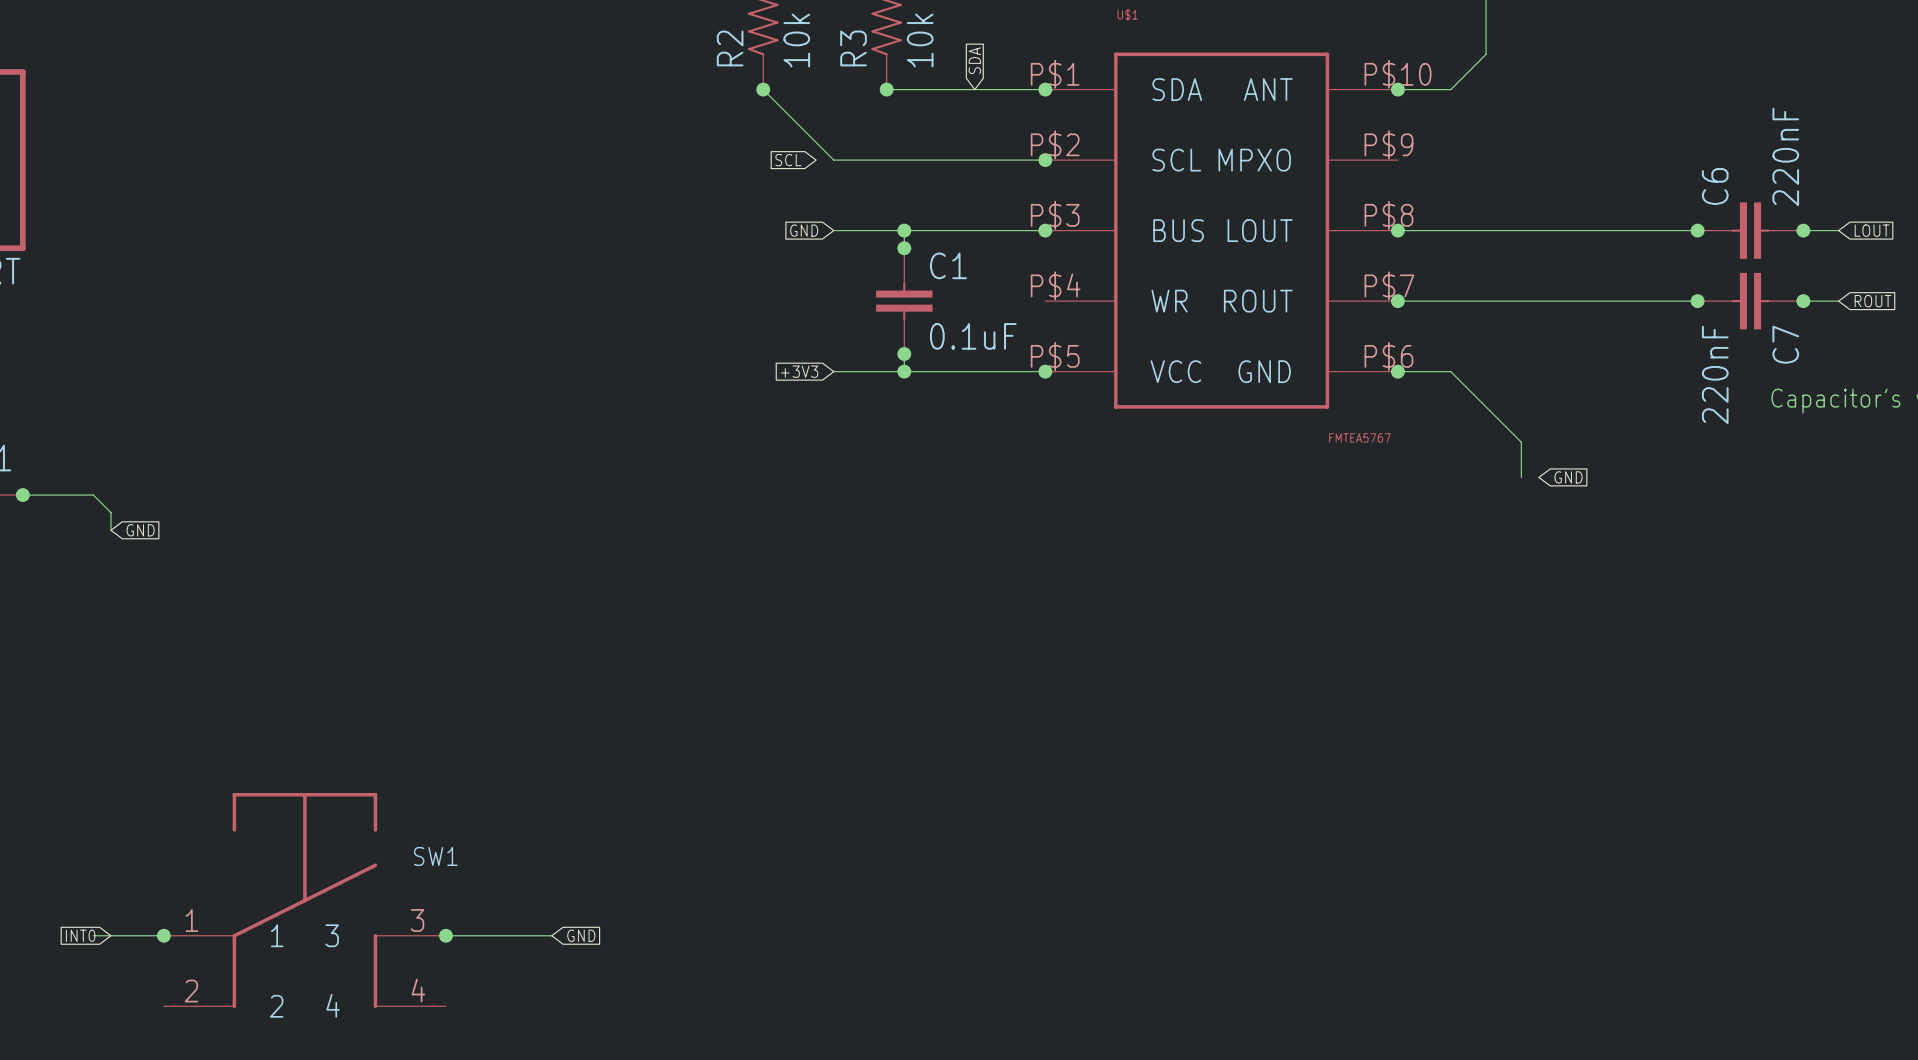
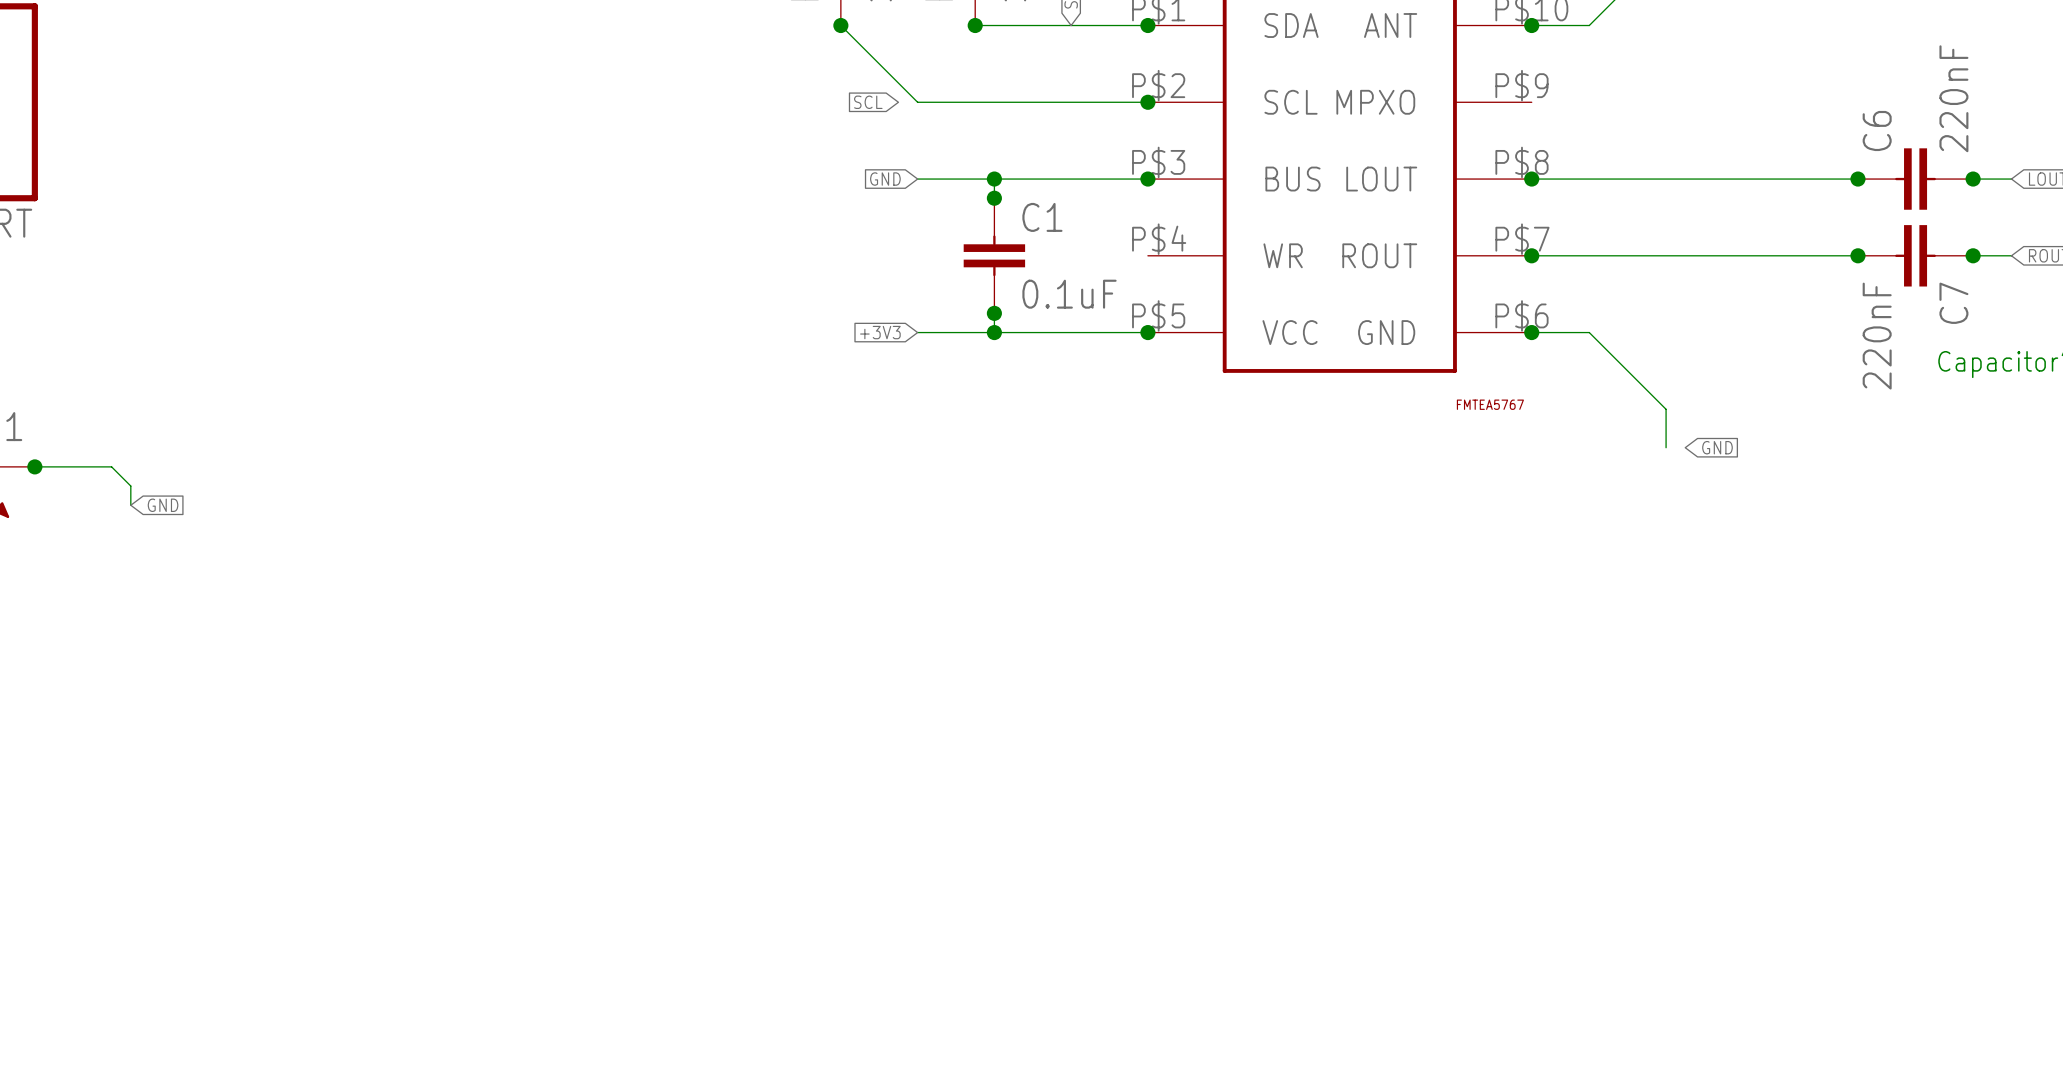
SW1: (304, 900) -> none
global label: INT0 (80, 935) -> none
wire: (93, 935) (163, 935) -> none
junction: (163, 935) -> none
wire: (445, 935) (551, 935) -> none
junction: (445, 935) -> none
global label: GND (581, 935) -> none

